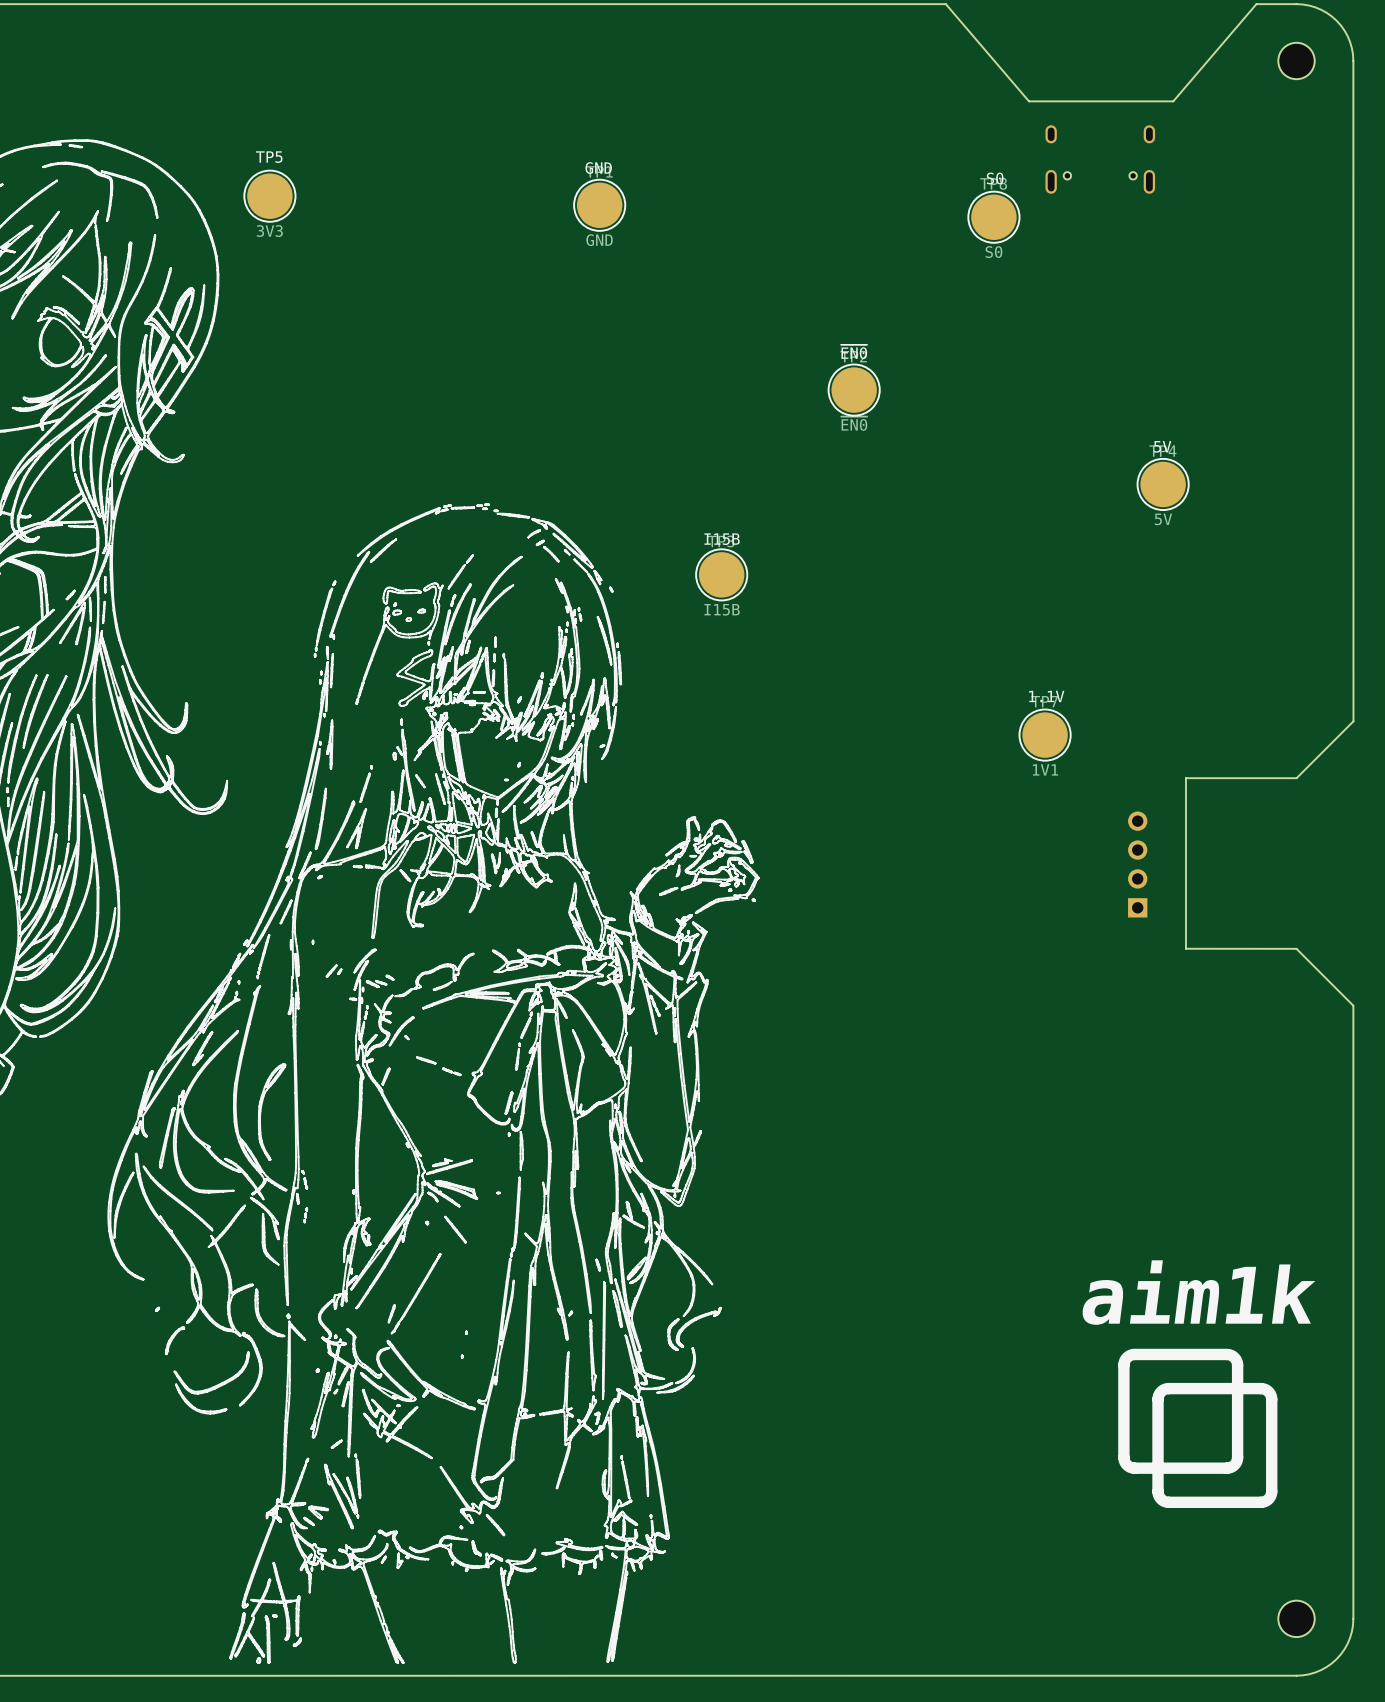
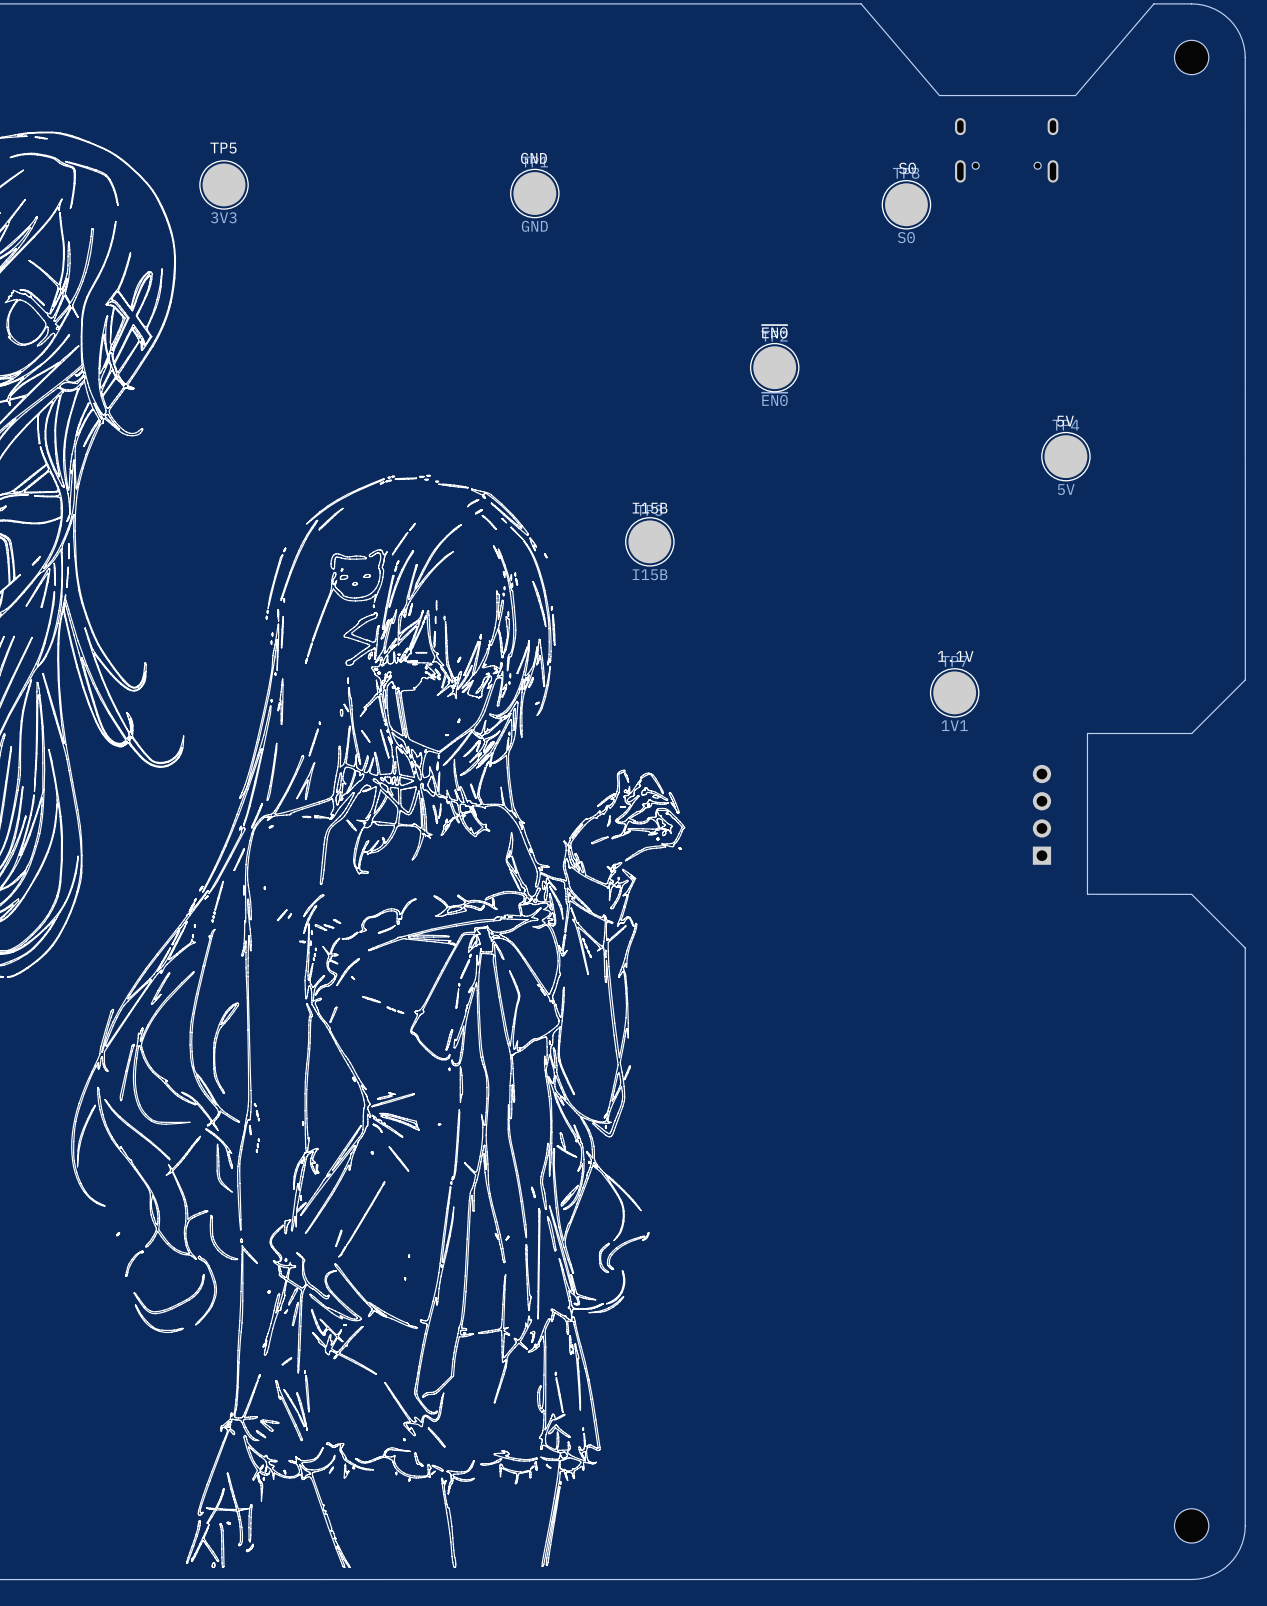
text: aim1k (1198, 1292) -> none
line: (1226, 1354) (1134, 1354) (1127, 1357) (1123, 1365) (1123, 1457) (1127, 1465) (1134, 1468) (1226, 1468) (1234, 1465) (1237, 1457) (1237, 1363) (1234, 1357) (1226, 1354) -> none
line: (1260, 1388) (1168, 1388) (1161, 1391) (1158, 1399) (1158, 1491) (1161, 1499) (1168, 1502) (1260, 1502) (1268, 1499) (1271, 1491) (1271, 1397) (1267, 1390) (1260, 1388) -> none

